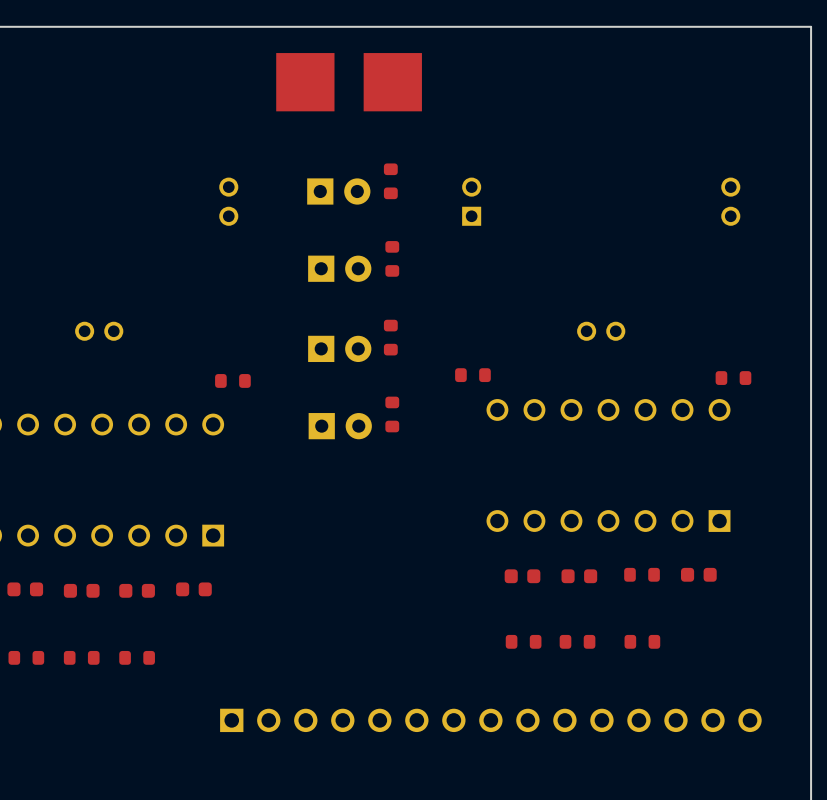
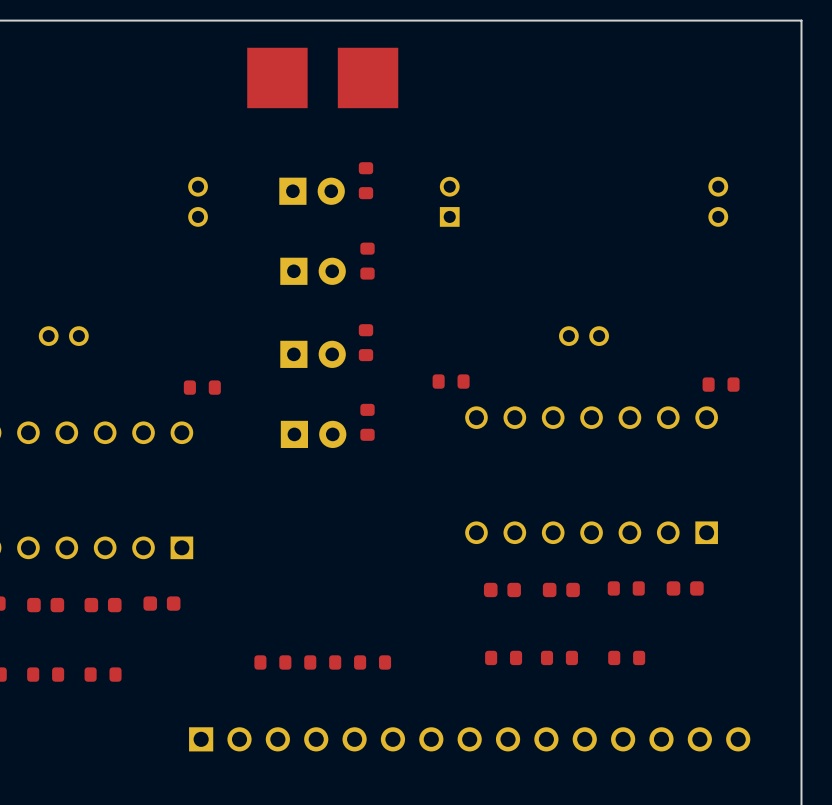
part: none -> (272, 662)
part: none -> (322, 662)
part: none -> (372, 662)

